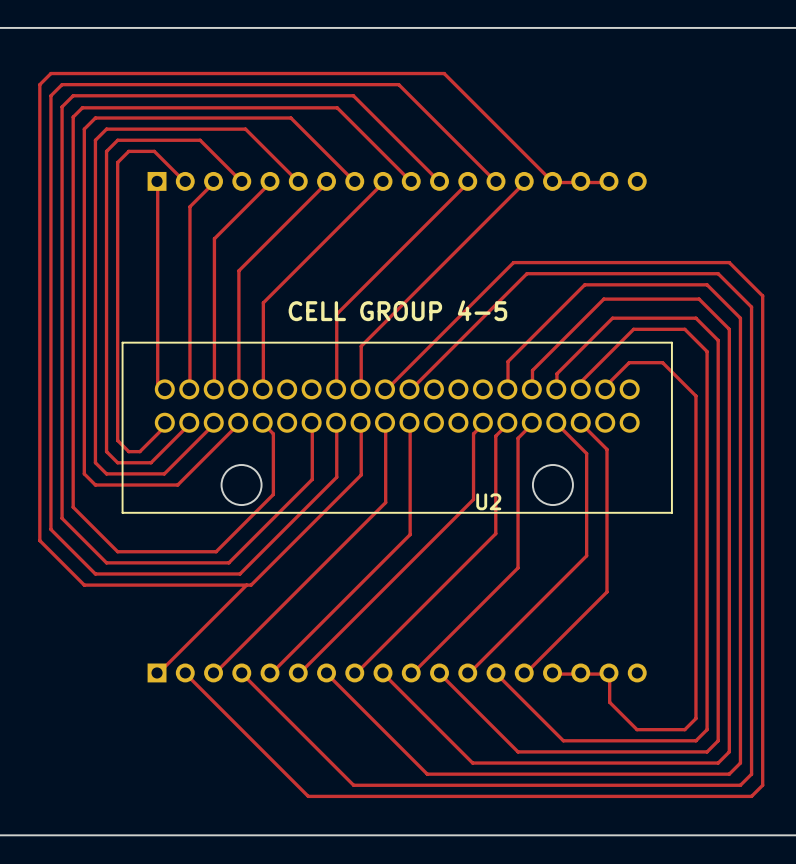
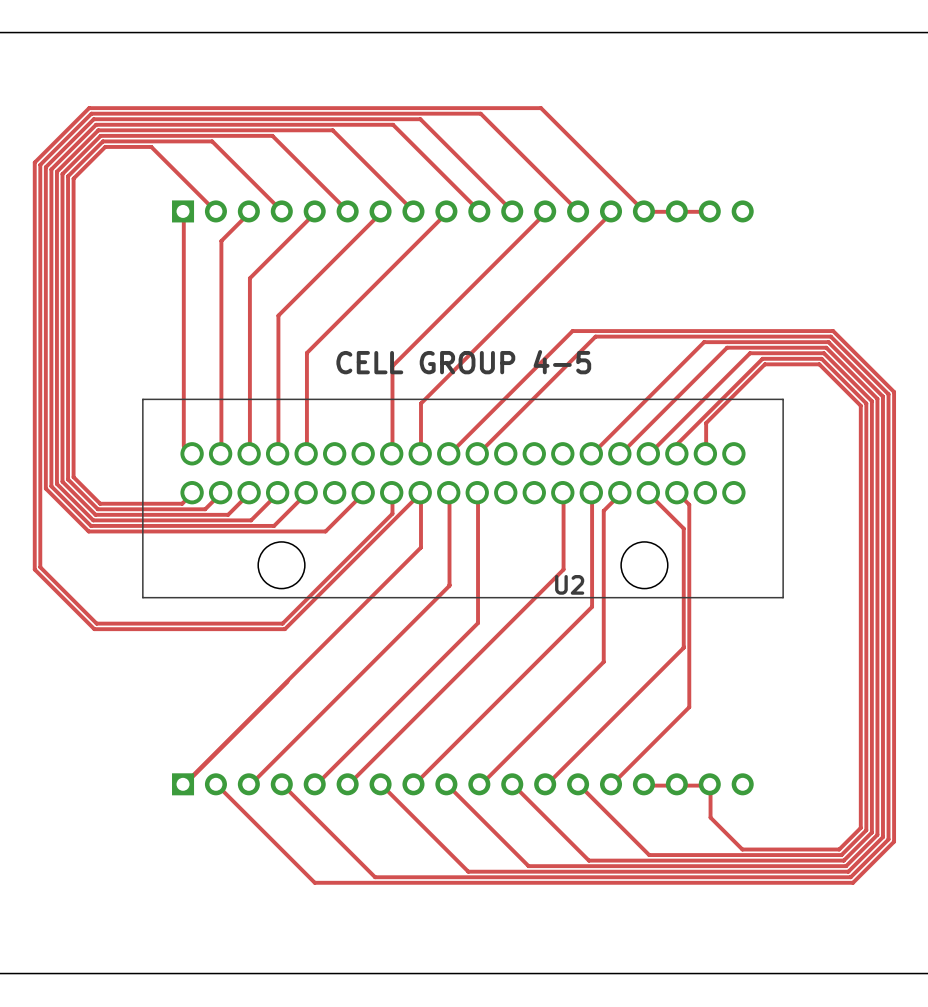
track: none -> (216, 211) (151, 146) (105, 146) (73, 178) (73, 477) (100, 503) (182, 503) (192, 493)
track: none -> (282, 211) (212, 141) (102, 141) (68, 176) (68, 479) (97, 509) (205, 509) (221, 493)
track: none -> (348, 211) (272, 135) (100, 135) (62, 174) (62, 481) (95, 514) (228, 514) (249, 493)
track: none -> (414, 211) (332, 130) (98, 130) (56, 171) (56, 484) (93, 520) (251, 520) (278, 493)
track: none -> (480, 211) (393, 124) (96, 124) (51, 169) (51, 486) (91, 525) (274, 525) (306, 493)
track: none -> (513, 211) (420, 119) (93, 119) (45, 167) (45, 488) (88, 531) (325, 531) (363, 493)
track: none -> (710, 211) (644, 211) (541, 108) (89, 108) (34, 162) (34, 569) (94, 629) (284, 629) (420, 493)
track: (185, 182) (154, 151) (128, 151) (117, 162) (117, 440) (128, 451) (139, 451) (165, 426) (165, 423) -> none
track: (242, 182) (200, 140) (117, 140) (106, 151) (106, 451) (117, 462) (151, 462) (189, 423) -> none
track: (298, 182) (245, 129) (106, 129) (95, 140) (95, 462) (106, 473) (164, 473) (214, 423) -> none
track: (355, 182) (290, 118) (95, 118) (84, 129) (84, 473) (95, 485) (177, 485) (238, 423) -> none
track: (411, 182) (337, 107) (82, 107) (73, 117) (73, 507) (117, 551) (216, 551) (273, 494) (273, 433) (263, 423) -> none
track: (440, 182) (353, 95) (73, 95) (62, 106) (62, 518) (106, 562) (228, 562) (312, 479) (312, 423) -> none
track: (496, 182) (398, 84) (62, 84) (50, 95) (50, 529) (95, 573) (240, 573) (336, 477) (336, 440) -> (578, 211) (480, 113) (91, 113) (40, 164) (40, 567) (96, 623) (282, 623) (392, 513)
track: (609, 182) (553, 182) (444, 73) (50, 73) (39, 84) (39, 540) (84, 585) (251, 585) (361, 475) (361, 469) -> (186, 784) (183, 784) (420, 547)
track: (581, 381) (633, 329) (684, 329) (707, 351) (707, 729) (695, 740) (563, 740) (496, 674) -> (677, 444) (762, 358) (821, 358) (866, 403) (866, 830) (841, 855) (649, 855) (578, 784)
track: (605, 386) (629, 362) (662, 362) (695, 396) (695, 718) (684, 729) (637, 729) (609, 701) -> (706, 449) (706, 423) (764, 364) (819, 364) (860, 405) (860, 827) (839, 849) (742, 849) (710, 817)
track: none -> (449, 454) (572, 331) (833, 331) (894, 391) (894, 841) (853, 882) (314, 882) (216, 784)
track: none -> (478, 454) (595, 336) (830, 336) (888, 394) (888, 839) (850, 877) (375, 877) (282, 784)
track: none -> (592, 454) (704, 342) (828, 342) (882, 396) (882, 837) (848, 871) (468, 871) (381, 784)
track: none -> (620, 454) (727, 347) (826, 347) (877, 398) (877, 834) (846, 866) (528, 866) (447, 784)
track: none -> (649, 454) (750, 353) (823, 353) (871, 401) (871, 832) (843, 860) (588, 860) (513, 784)
track: (385, 390) (513, 262) (729, 262) (762, 295) (762, 785) (751, 796) (308, 796) (185, 674) -> none
track: (410, 390) (526, 273) (718, 273) (751, 307) (751, 774) (740, 785) (353, 785) (242, 674) -> none
track: (508, 390) (508, 361) (584, 284) (707, 284) (740, 318) (740, 763) (729, 774) (427, 774) (327, 674) -> none
track: (532, 390) (532, 370) (603, 299) (699, 299) (729, 329) (729, 751) (718, 763) (472, 763) (383, 674) -> none
track: (556, 390) (556, 373) (612, 318) (695, 318) (718, 340) (718, 740) (707, 751) (518, 751) (440, 674) -> none
track: (483, 423) (473, 433) (473, 499) (298, 674) -> none
track: none -> (563, 493) (563, 569) (348, 784)
track: (508, 423) (495, 436) (495, 533) (355, 674) -> none
track: none -> (592, 493) (592, 606) (414, 784)
track: (581, 423) (606, 449) (606, 591) (524, 674) -> none
track: none -> (677, 493) (689, 504) (689, 707) (611, 784)

